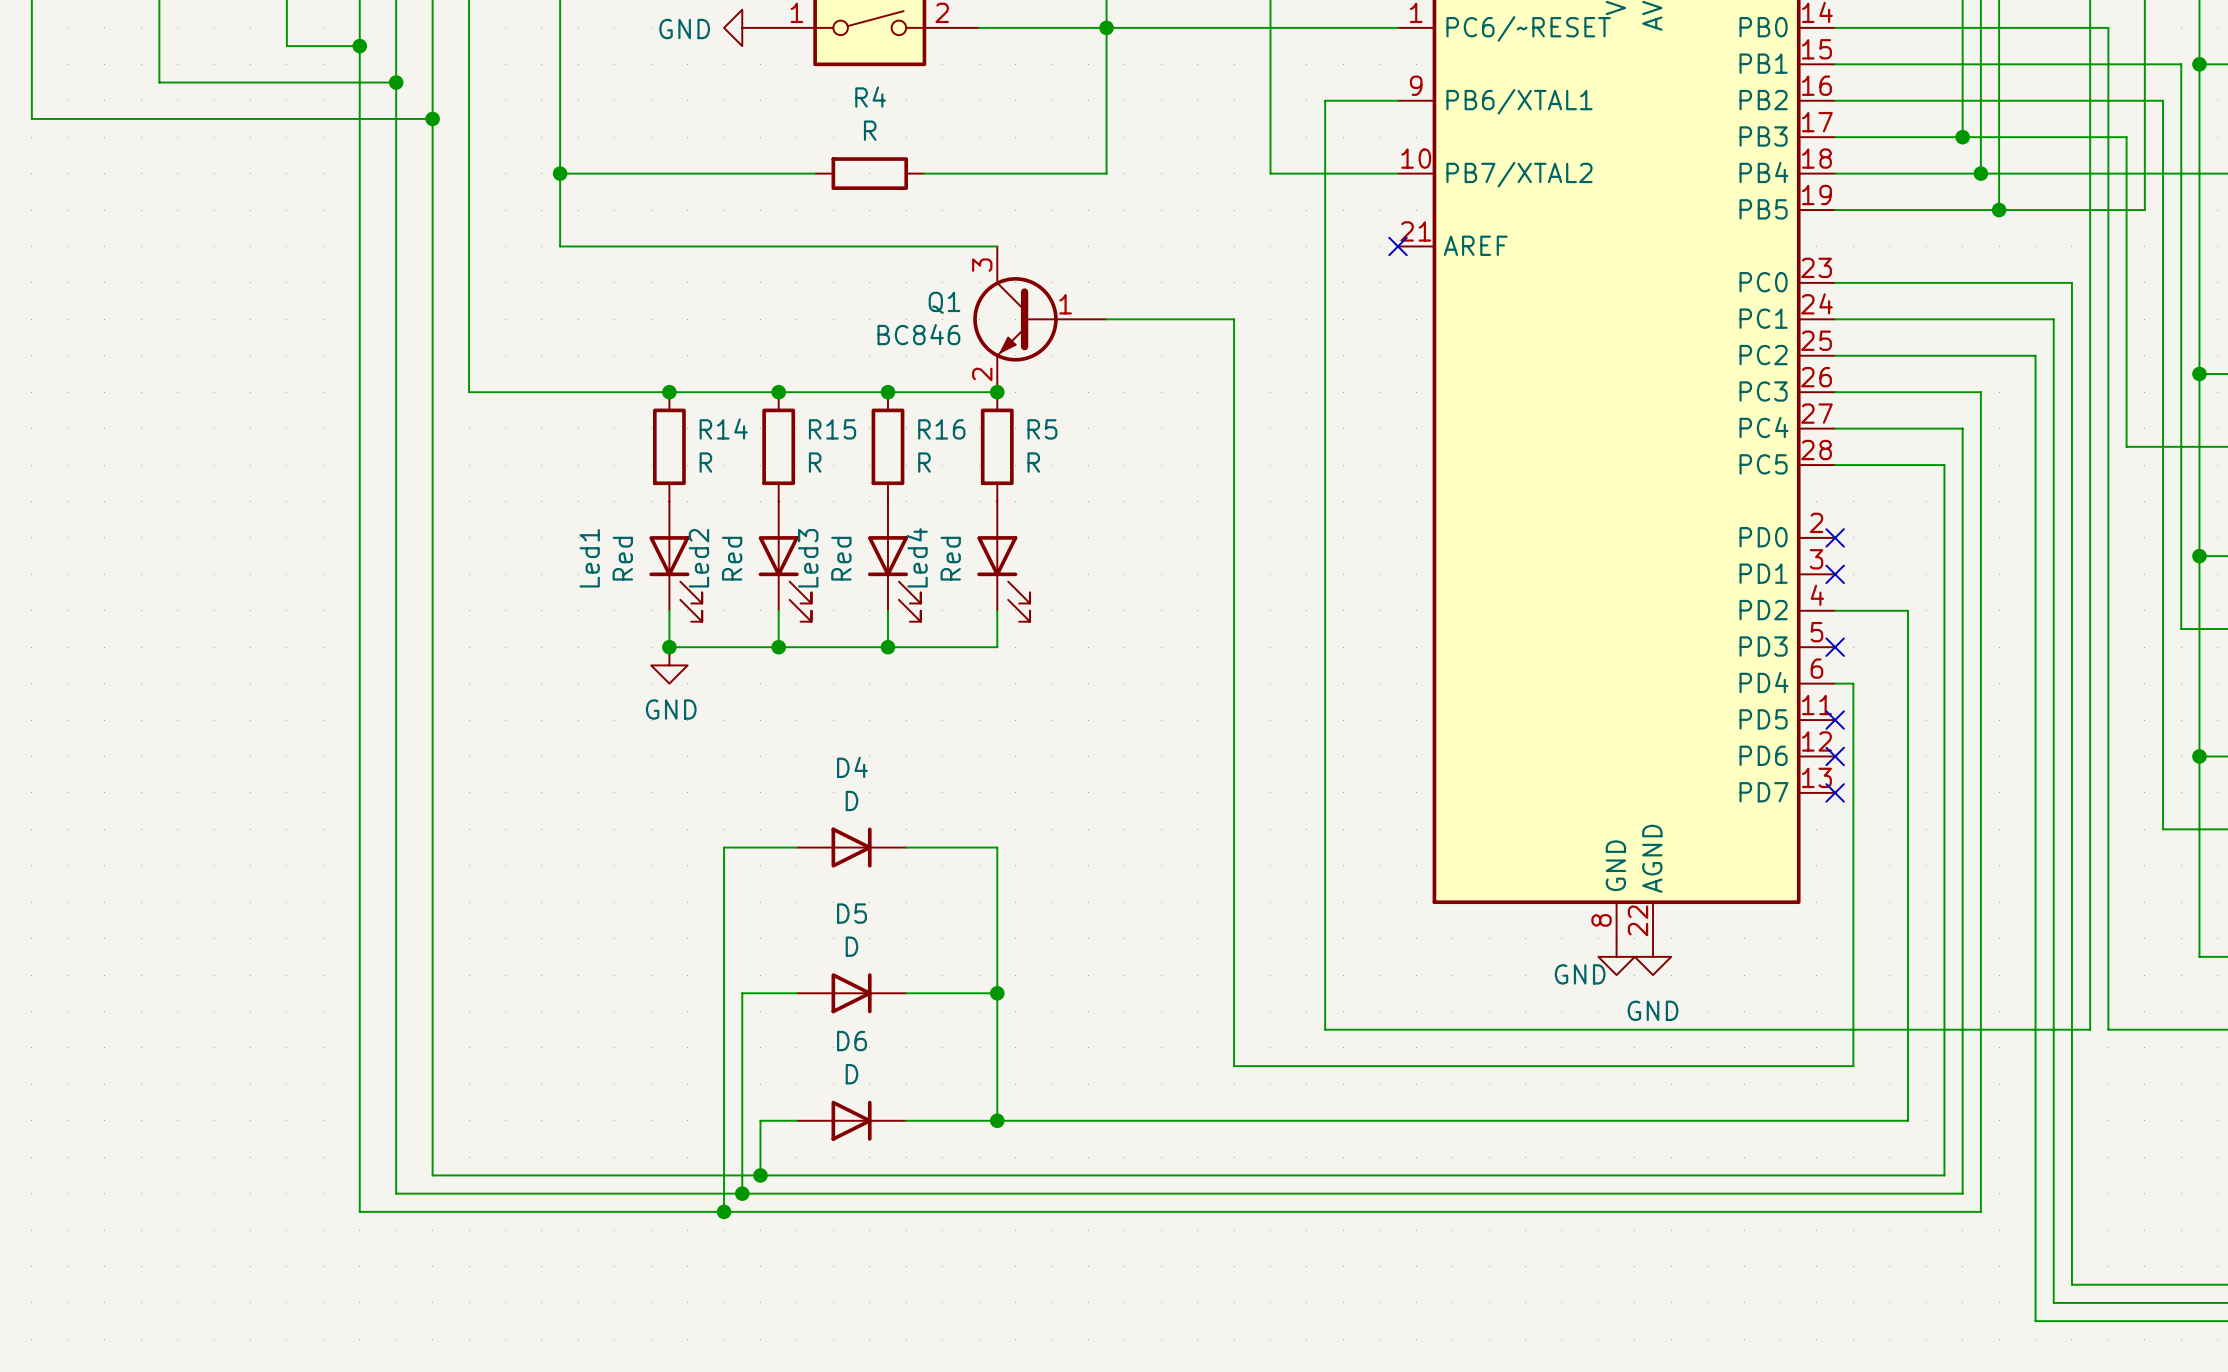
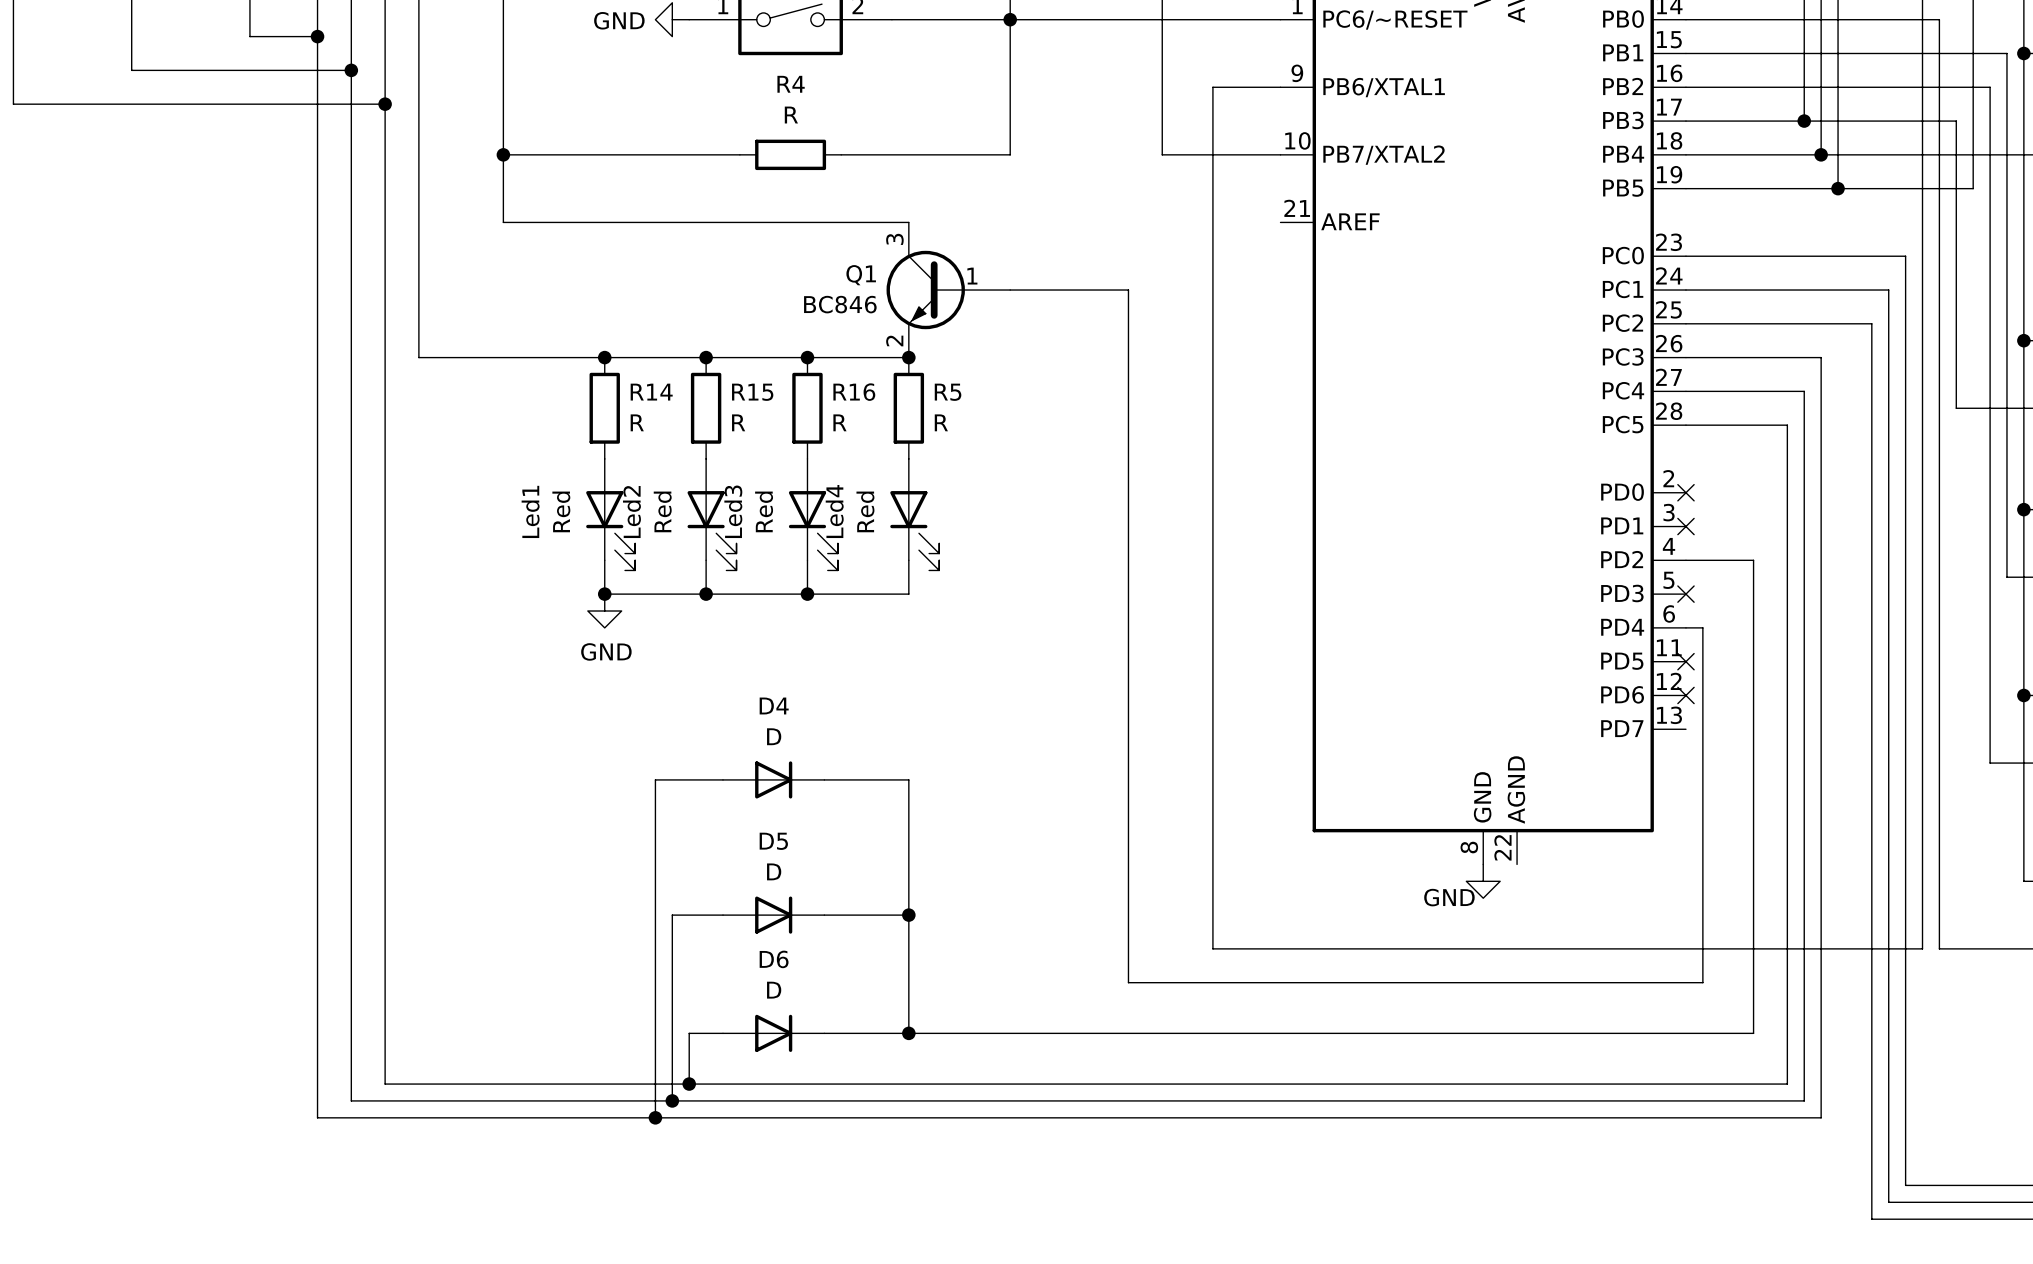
no-connect mark: (1398, 246) -> none
no-connect mark: (1835, 792) -> none
power symbol: GND (1653, 956) -> none

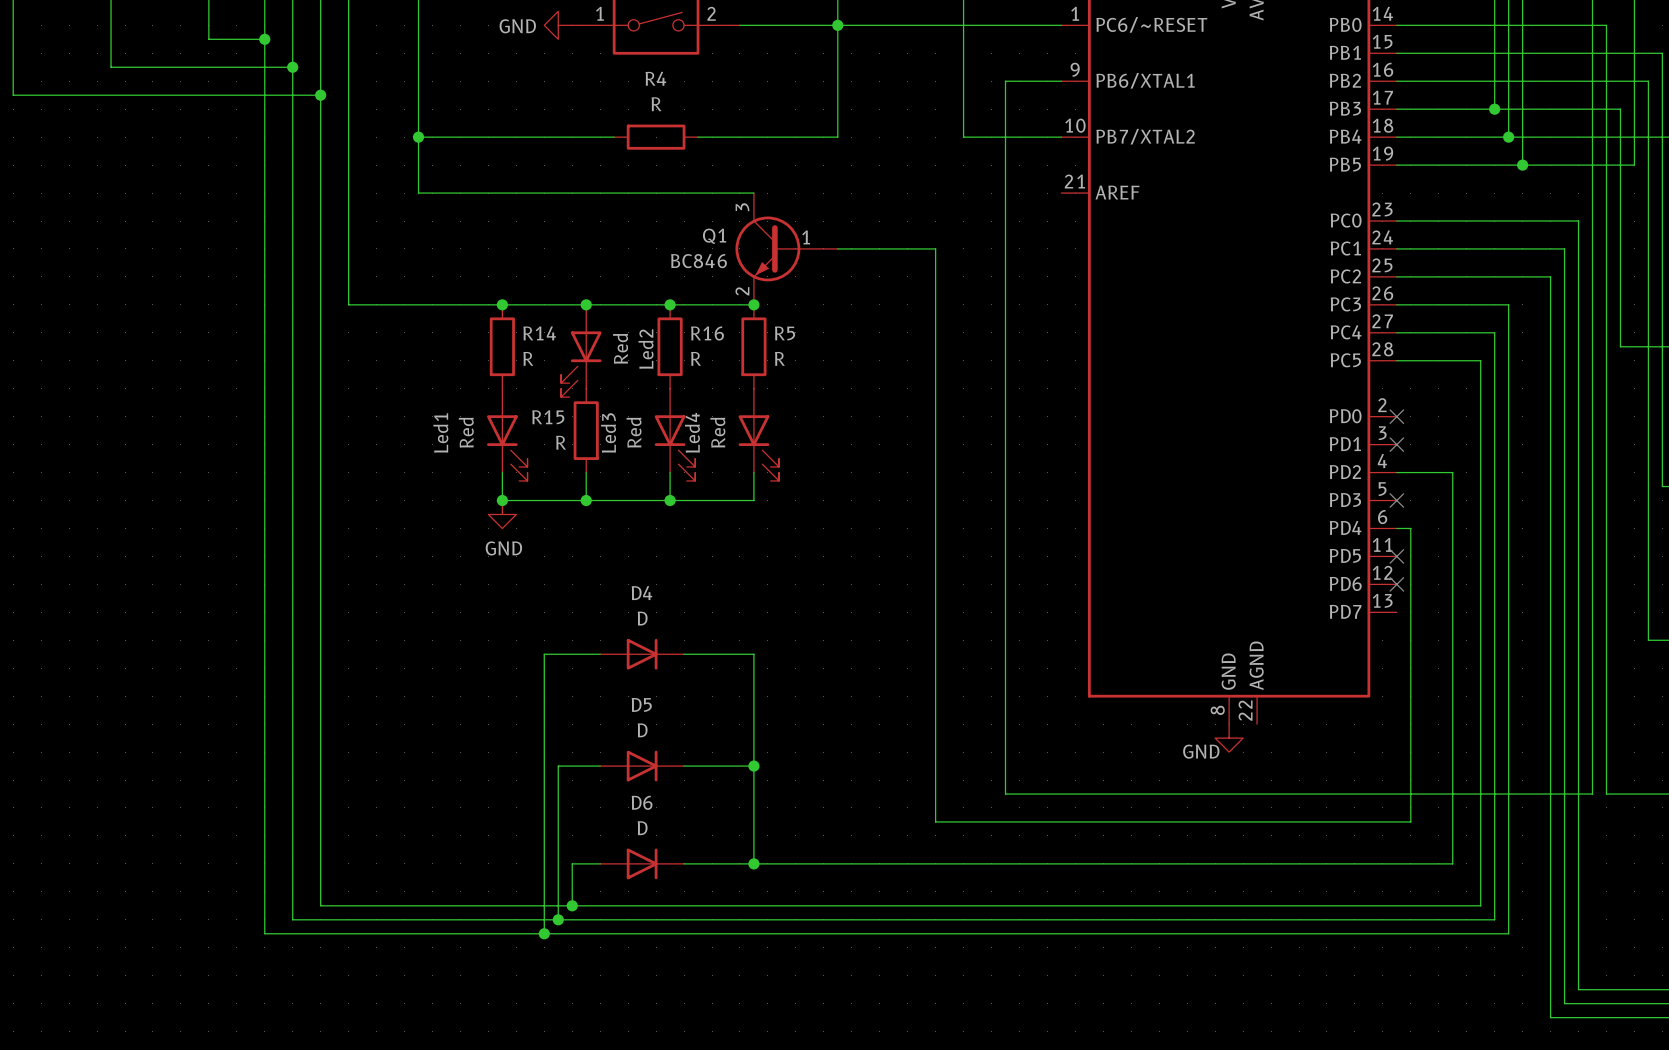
R15 name position: R15 (752, 392) -> R15 (548, 417)
R15 position: (706, 408) -> (586, 430)
R15 value position: R (738, 422) -> R (561, 442)
Led2 position: (712, 514) -> (581, 350)
Led2 flip: as is (712, 530) -> left-right (581, 364)

